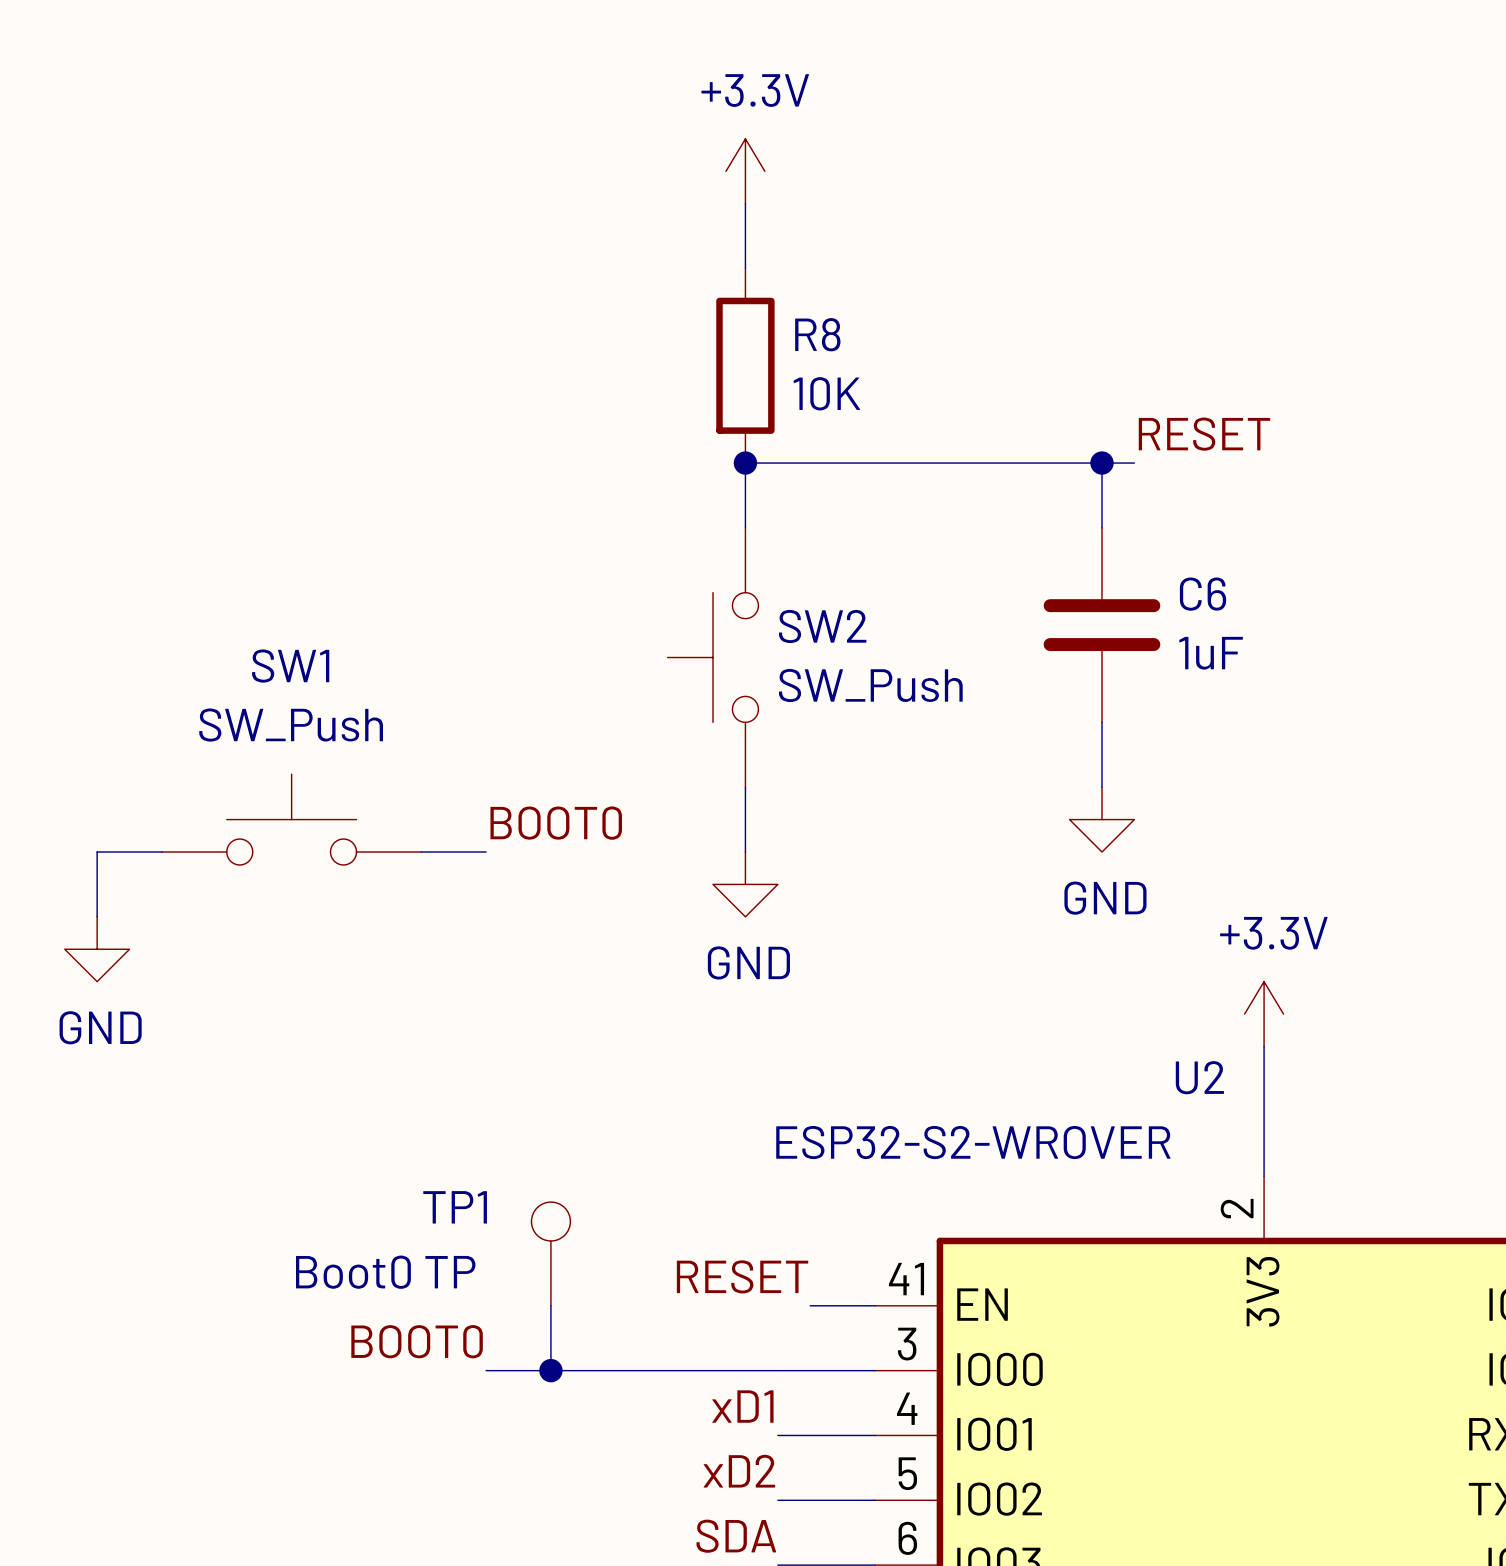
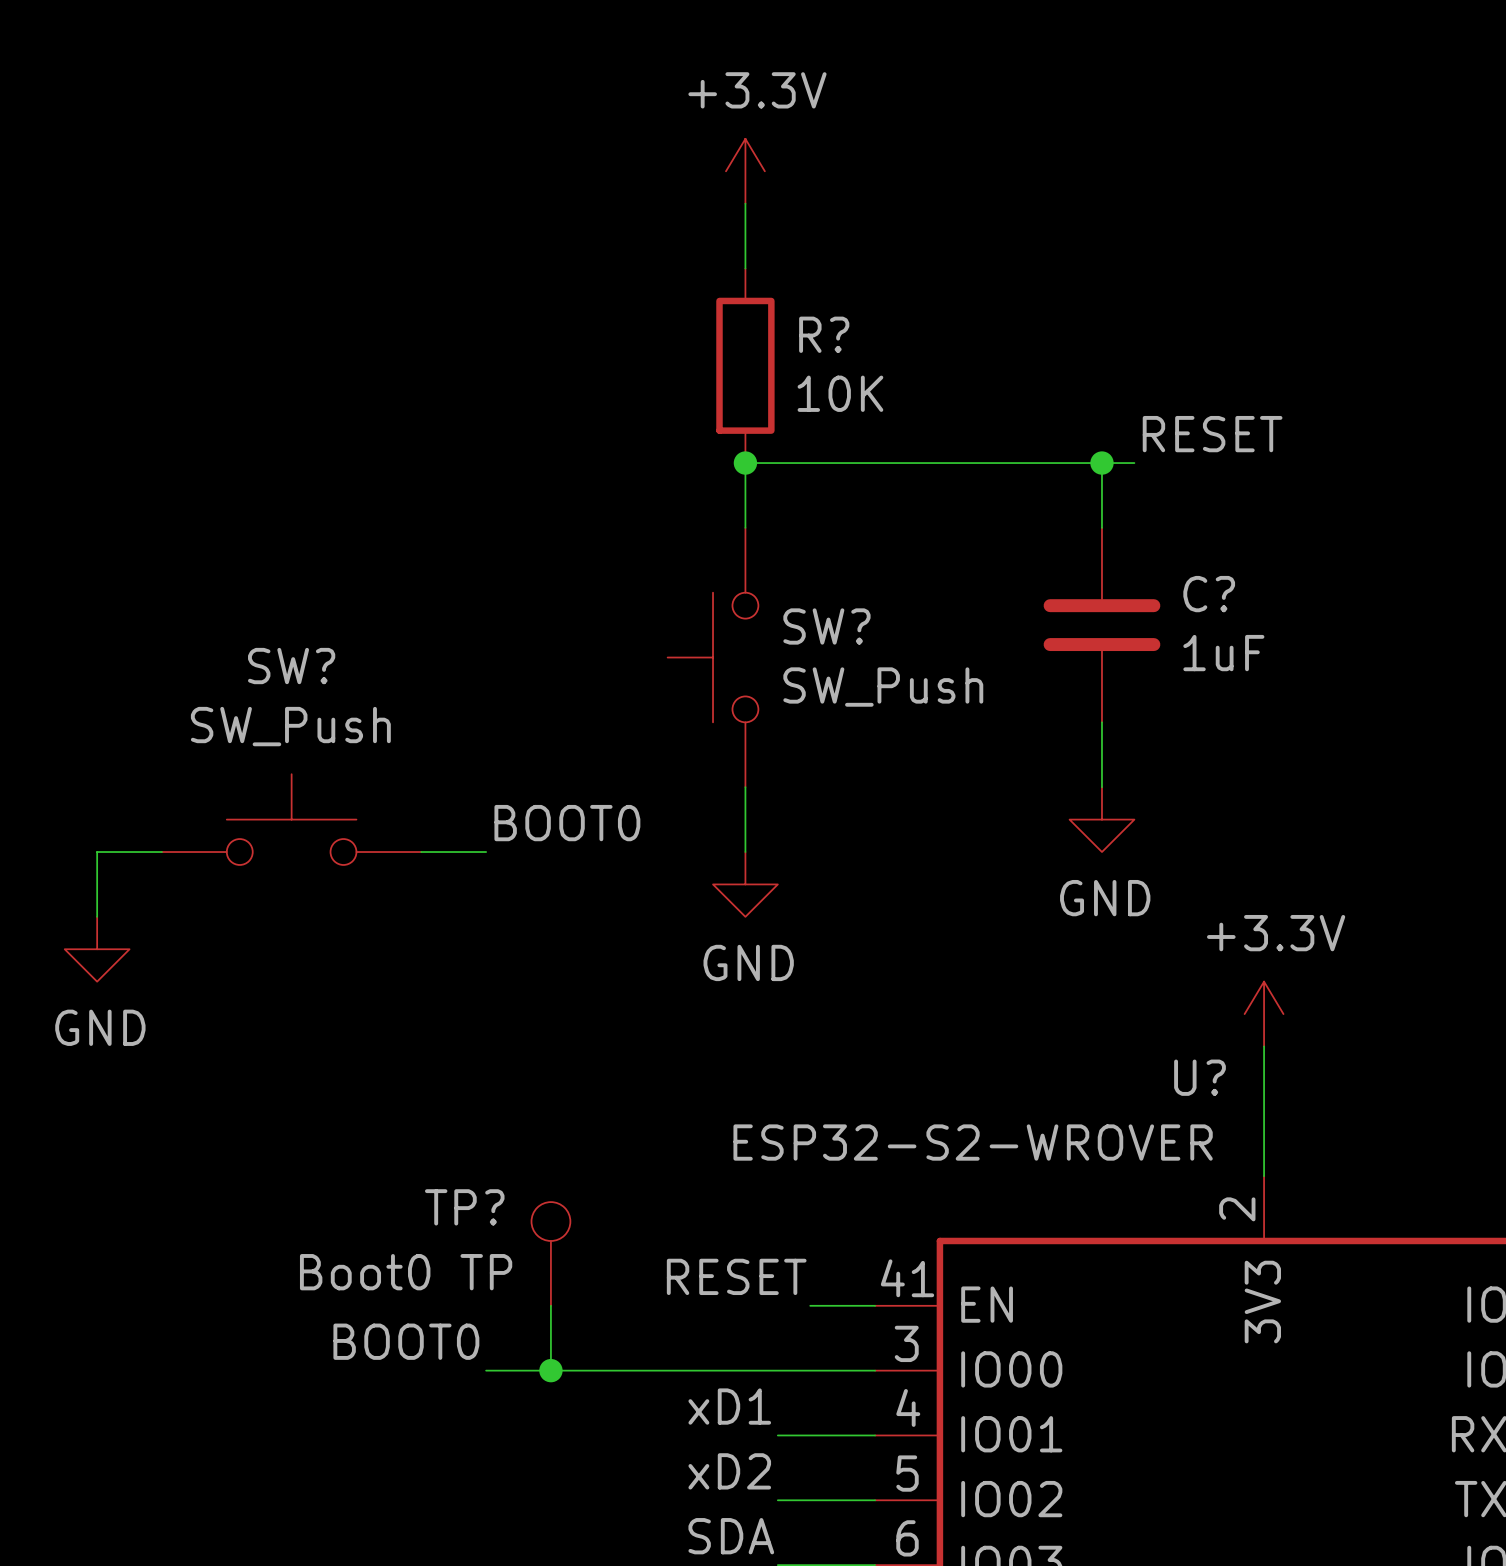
R8 name: R8 (817, 334) -> R? (824, 334)
C6 name: C6 (1203, 594) -> C? (1209, 594)
SW2 name: SW2 (822, 626) -> SW? (826, 626)
SW1 name: SW1 (290, 666) -> SW? (291, 666)
U2 name: U2 (1199, 1077) -> U? (1200, 1077)
TP1 name: TP1 (455, 1207) -> TP? (464, 1207)

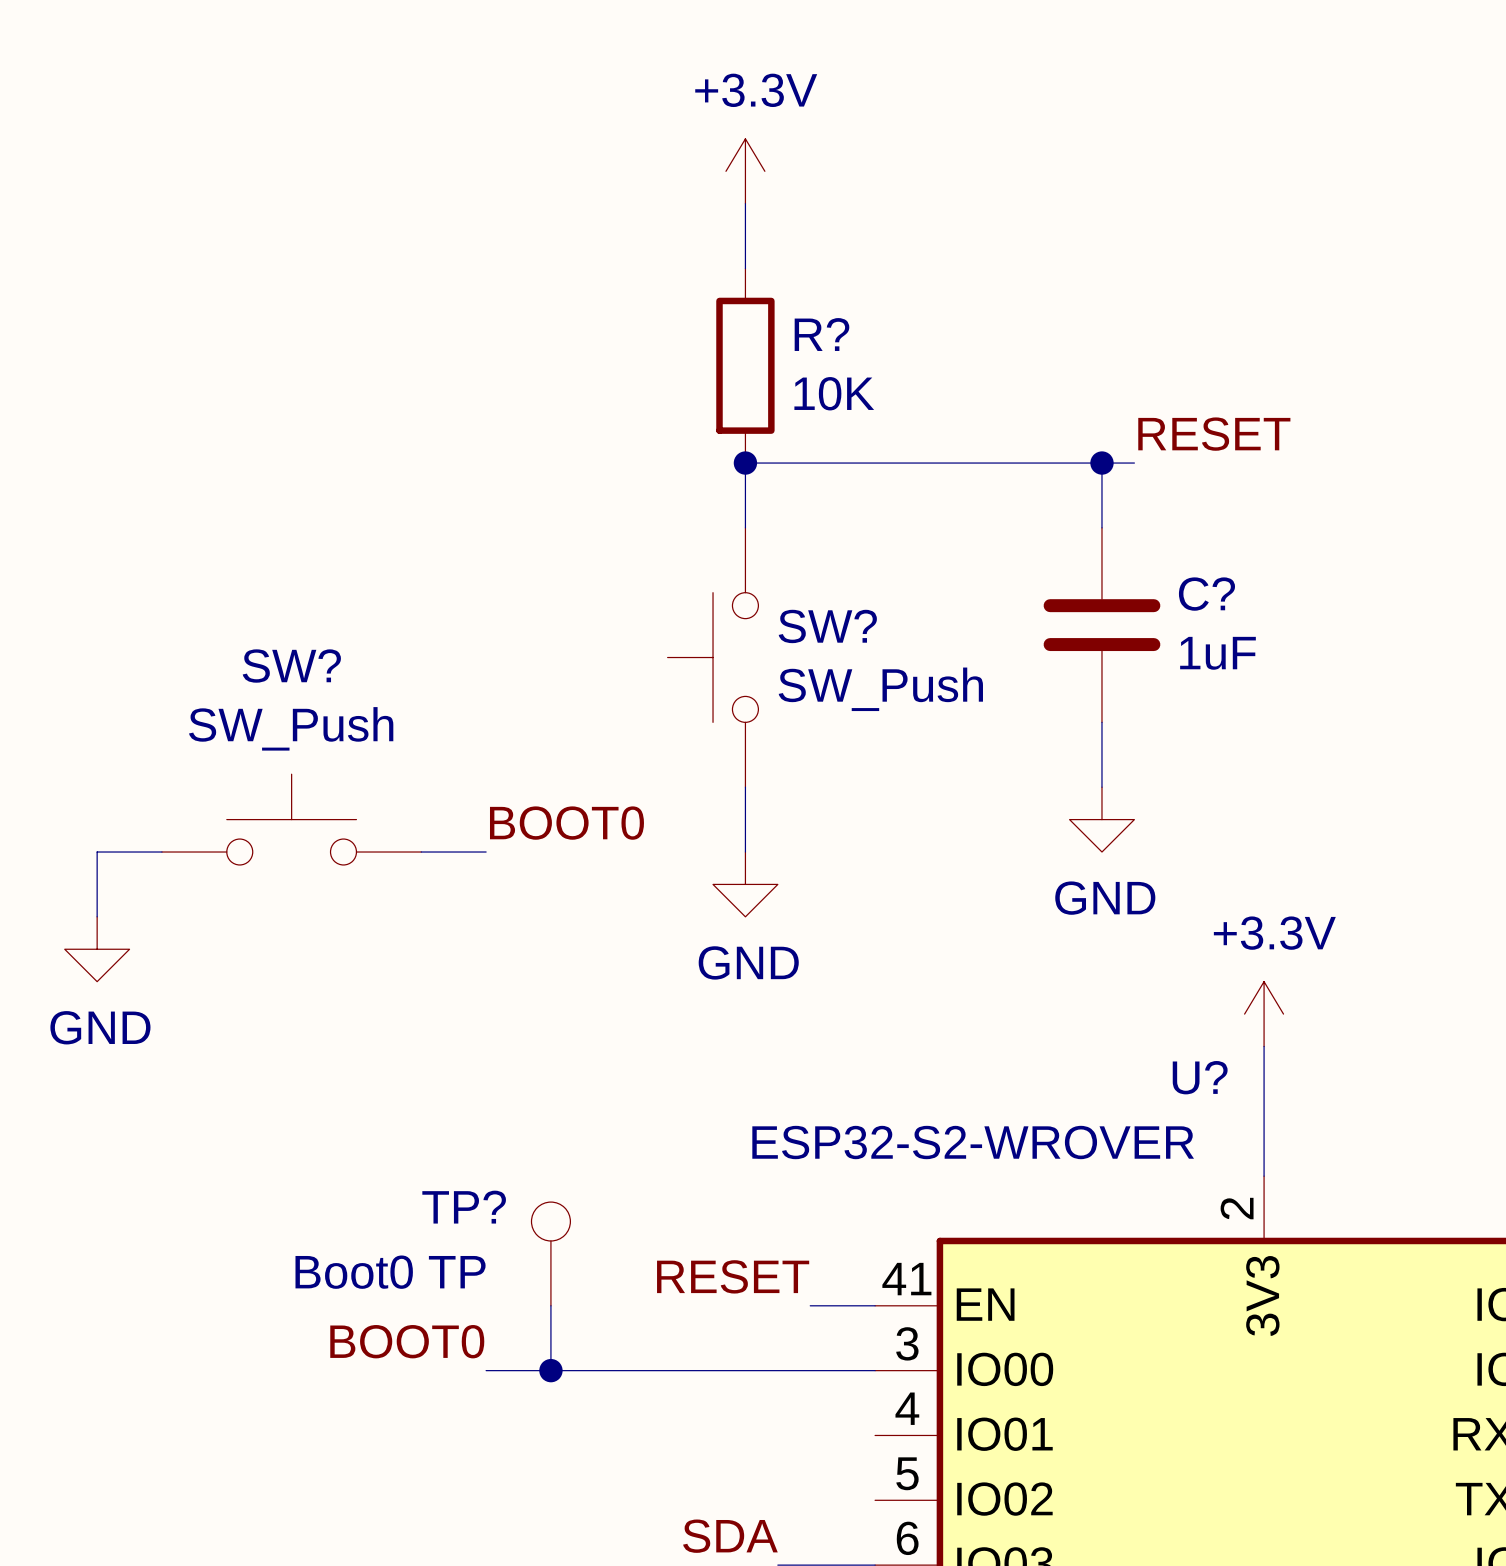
label: xD1 (729, 1406) -> none
wire: (777, 1435) (875, 1435) -> none
label: xD2 (729, 1471) -> none
wire: (777, 1500) (875, 1500) -> none

